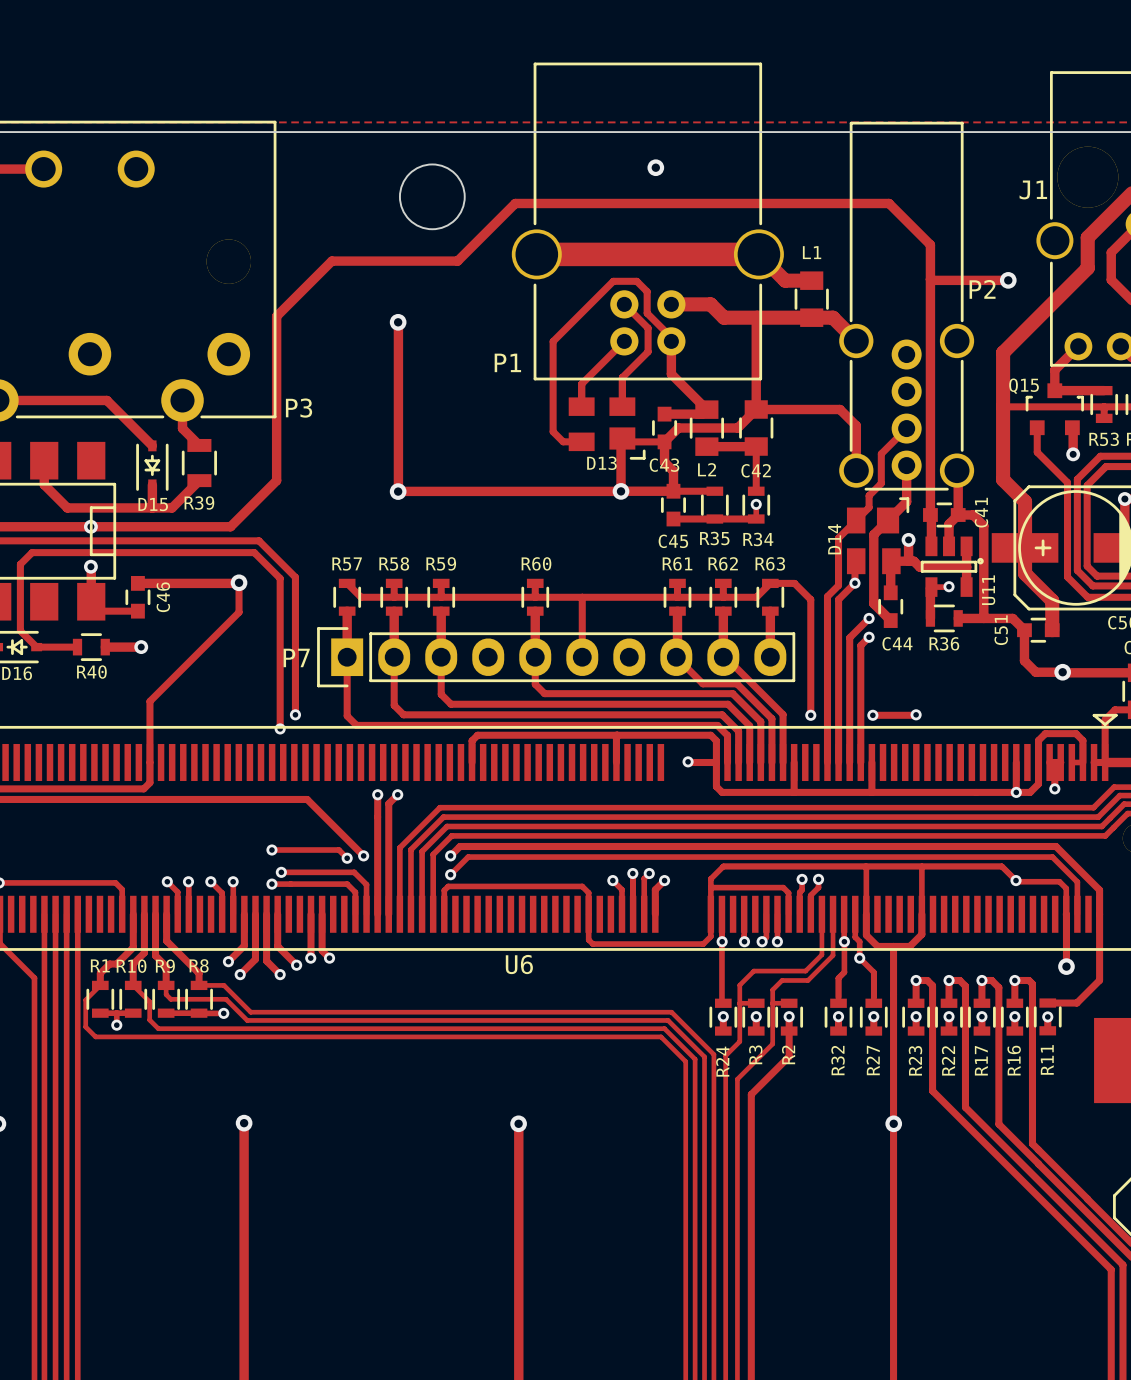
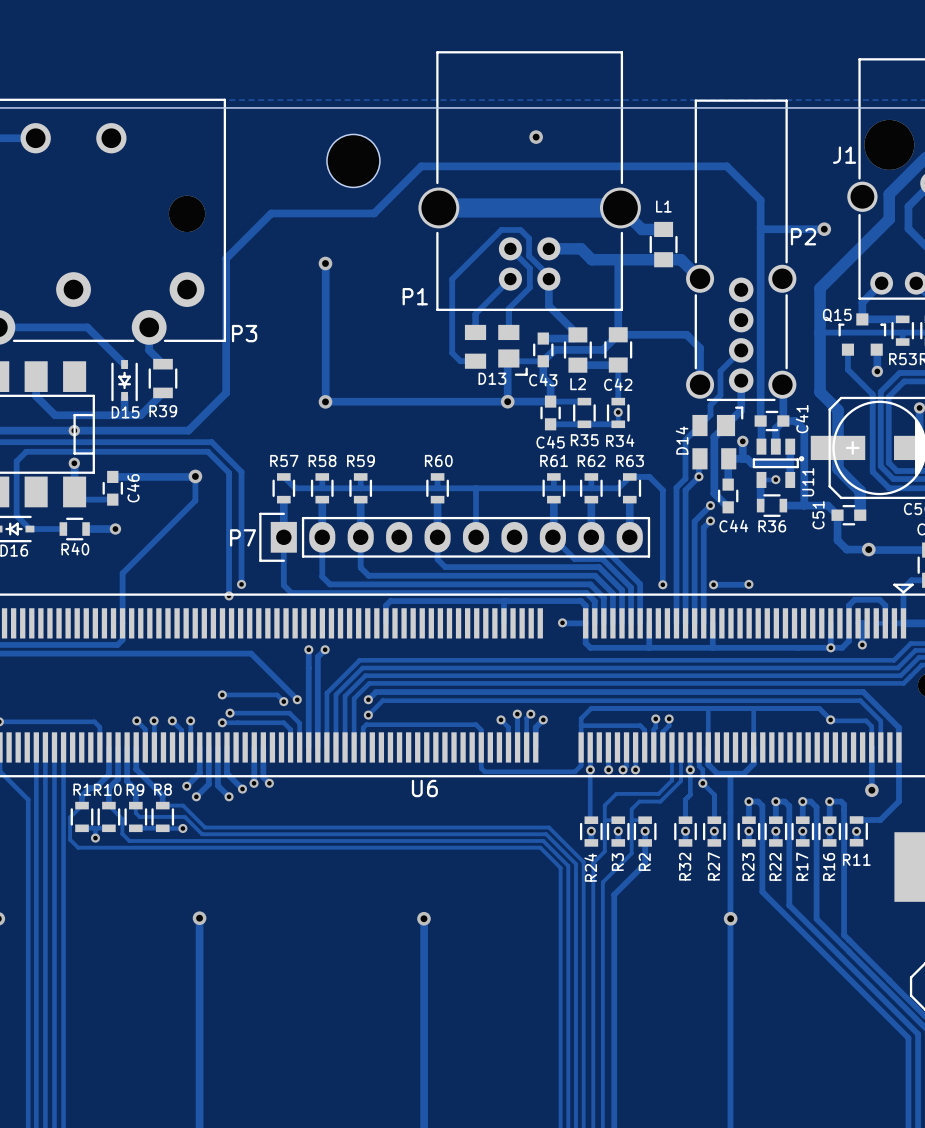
R11 name rotation: 0° (1047, 1059) -> 90° clockwise (856, 859)

